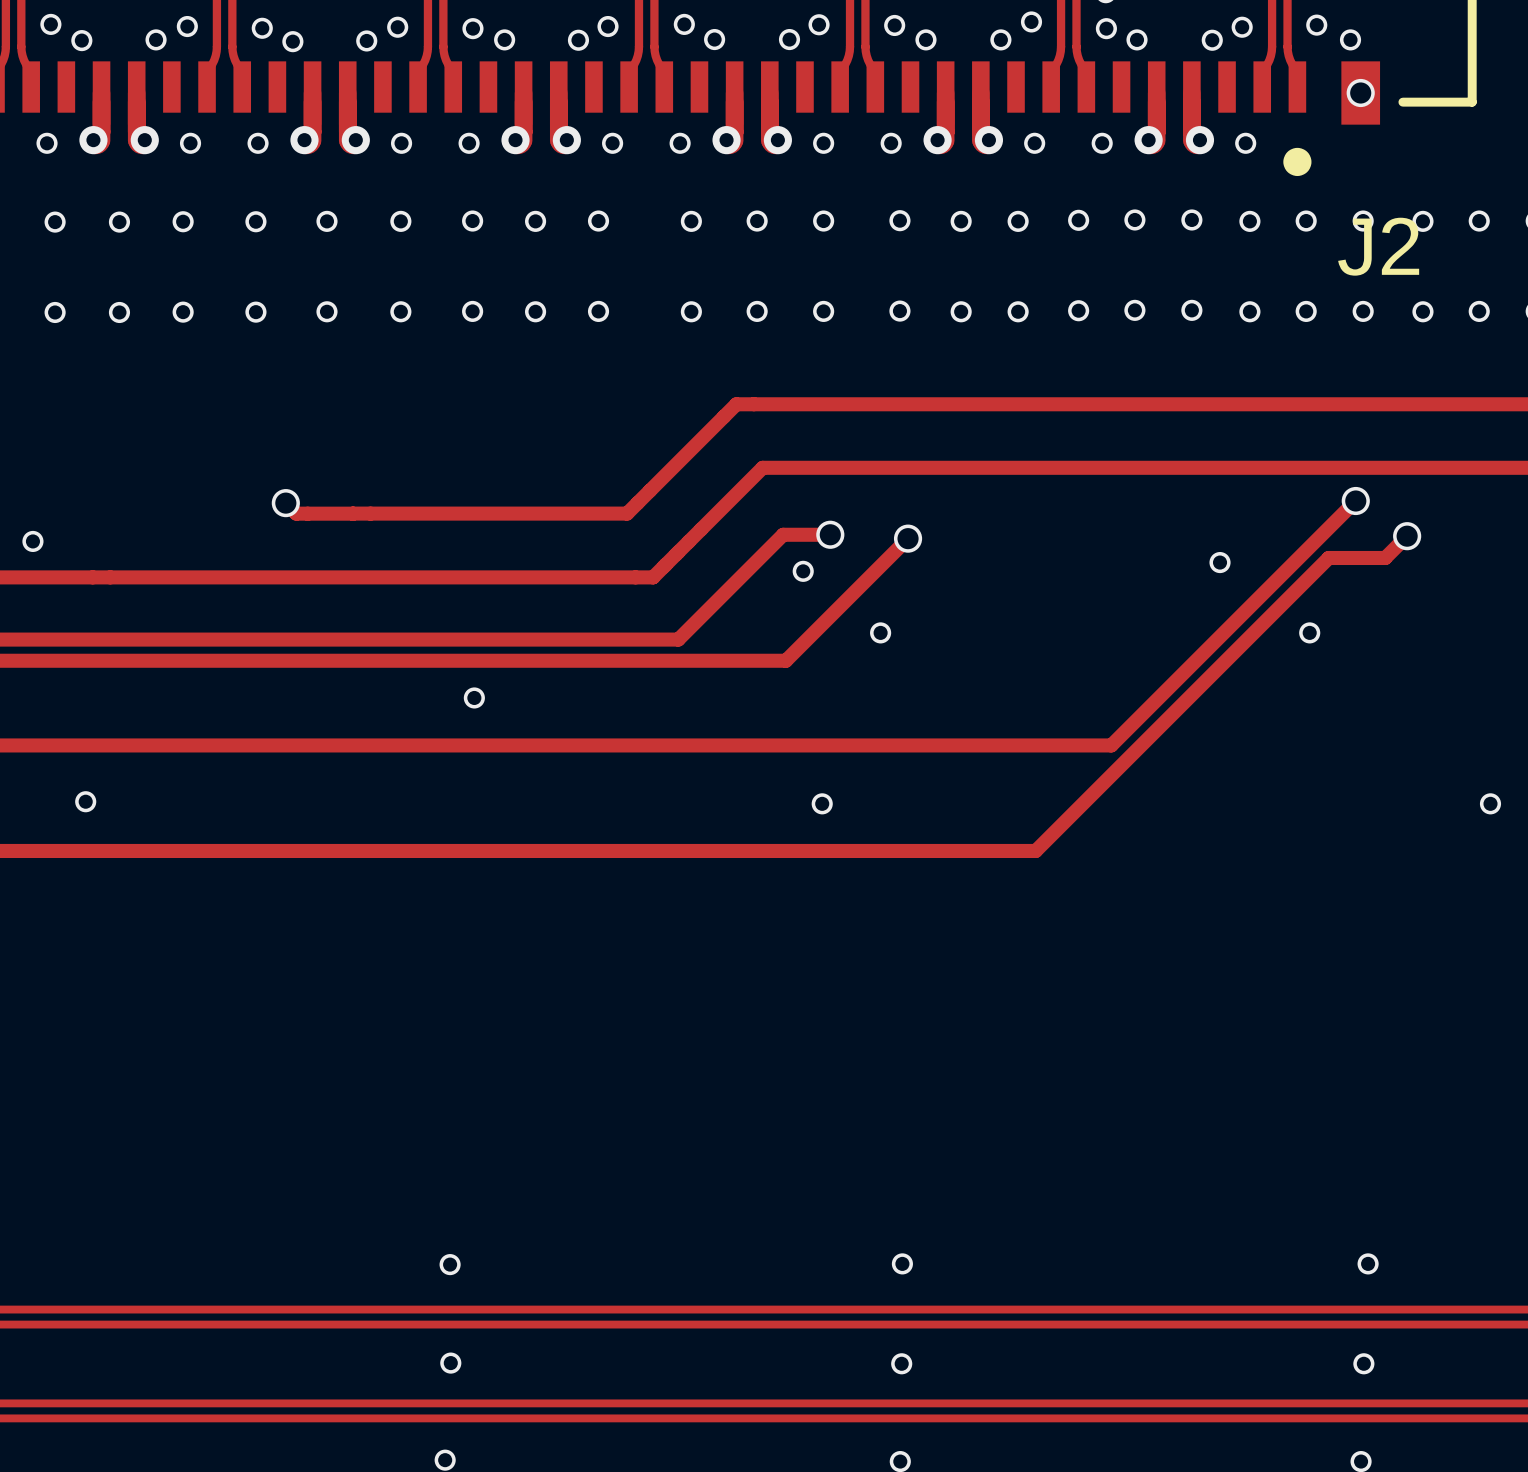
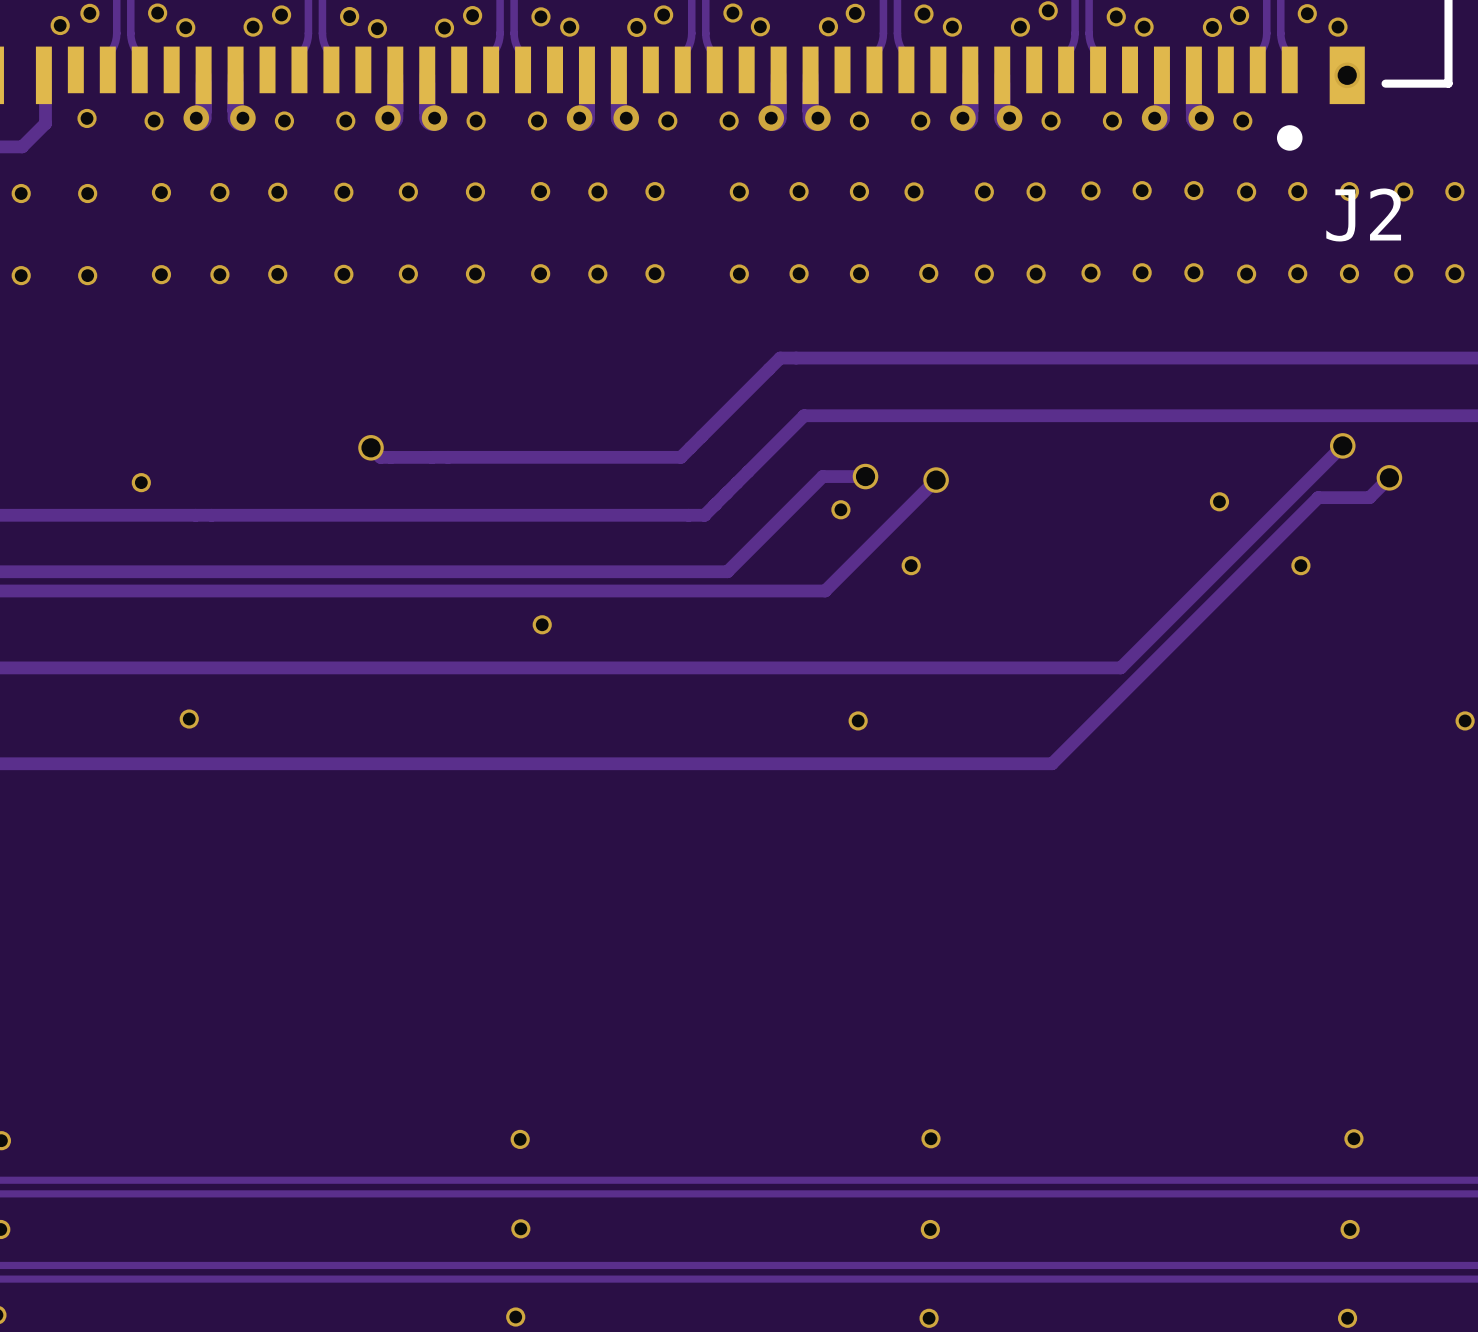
via position: (899, 220) -> (914, 191)

